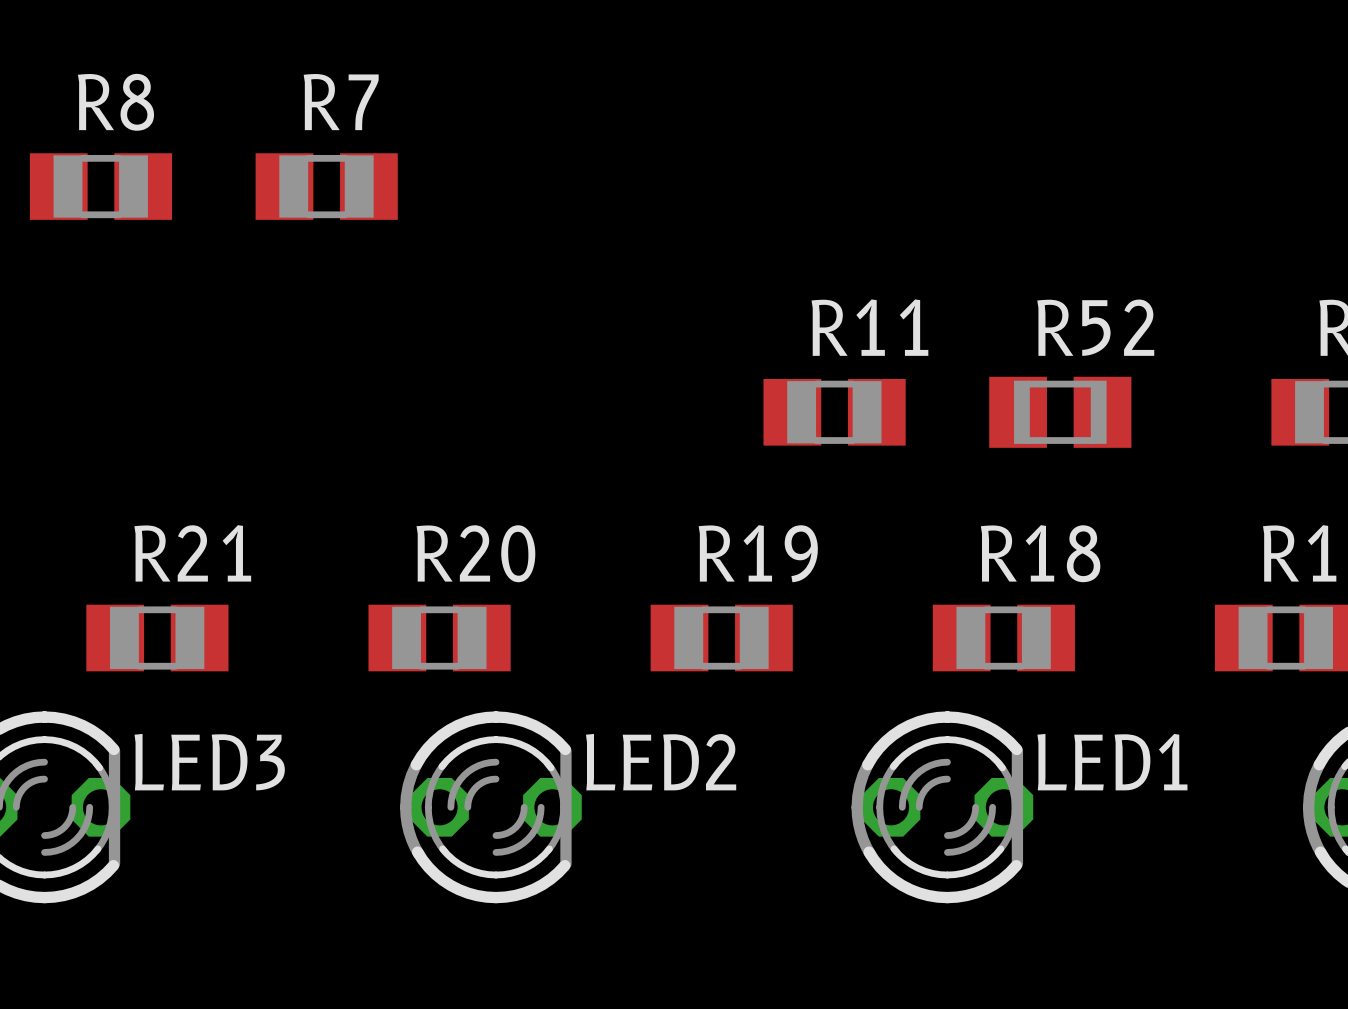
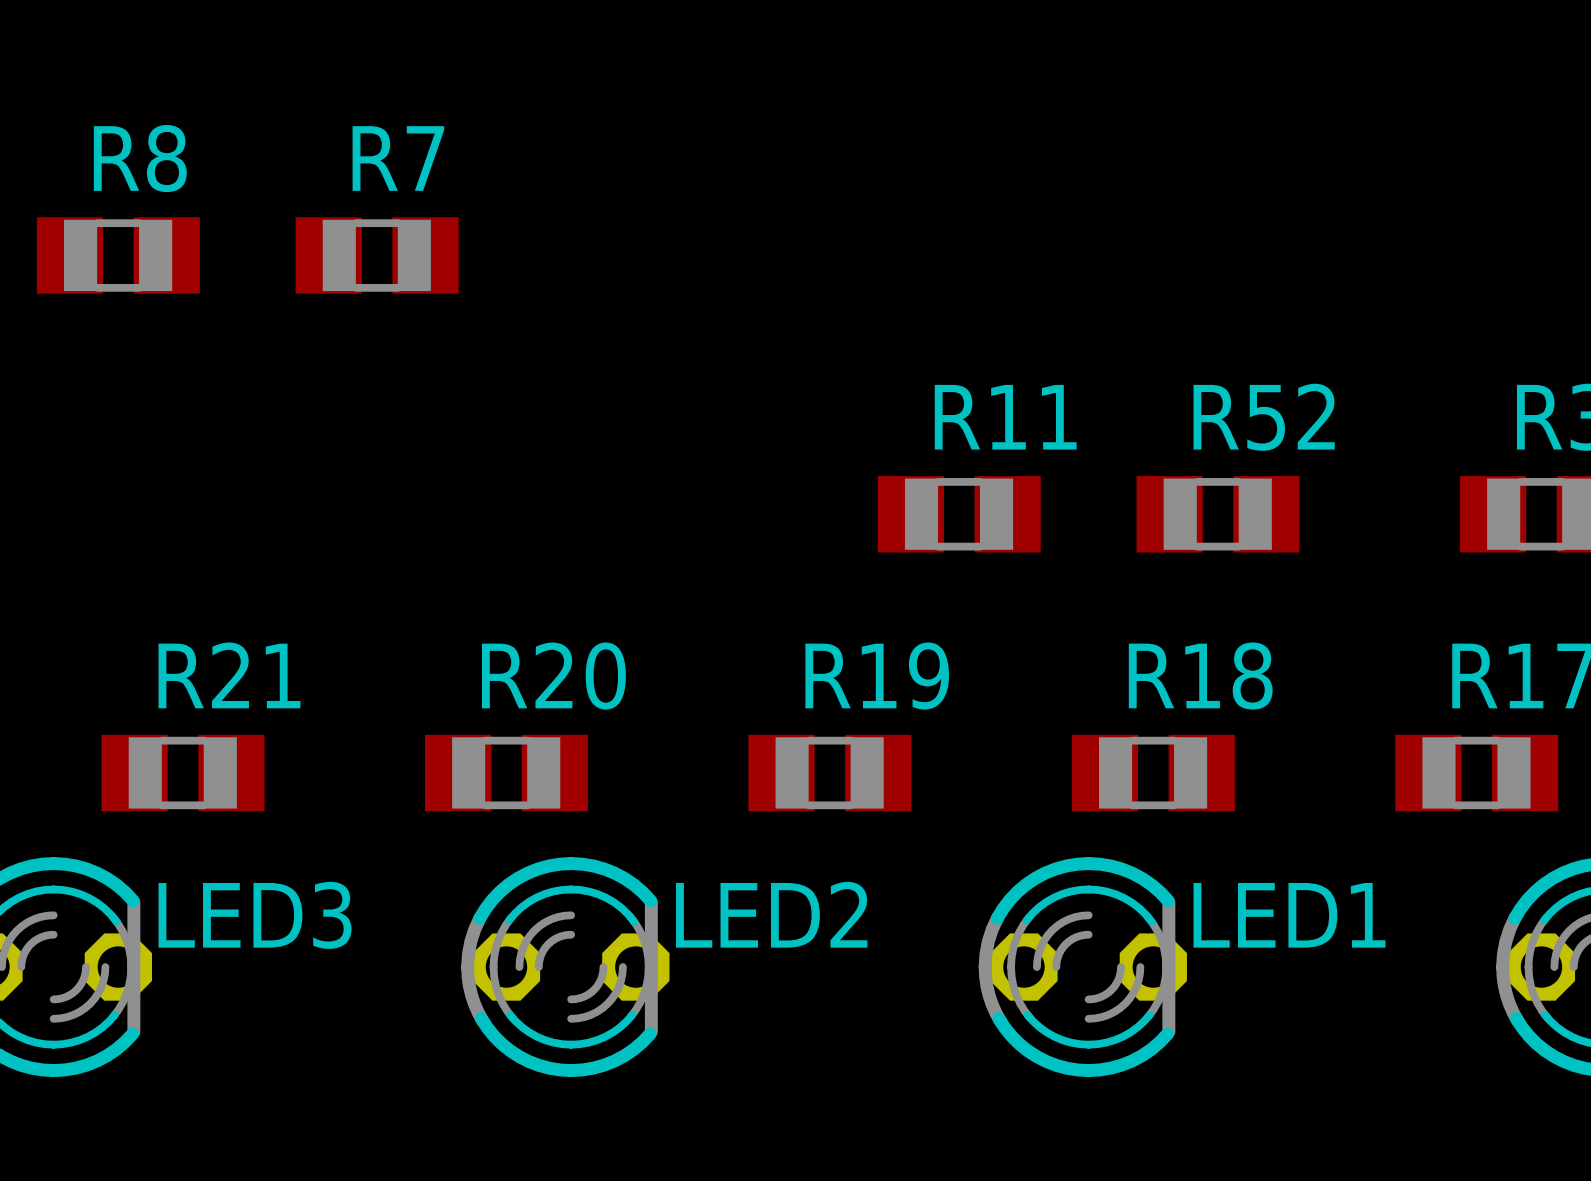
R52 footprint: [989, 376, 1132, 448] -> [1136, 476, 1300, 553]

